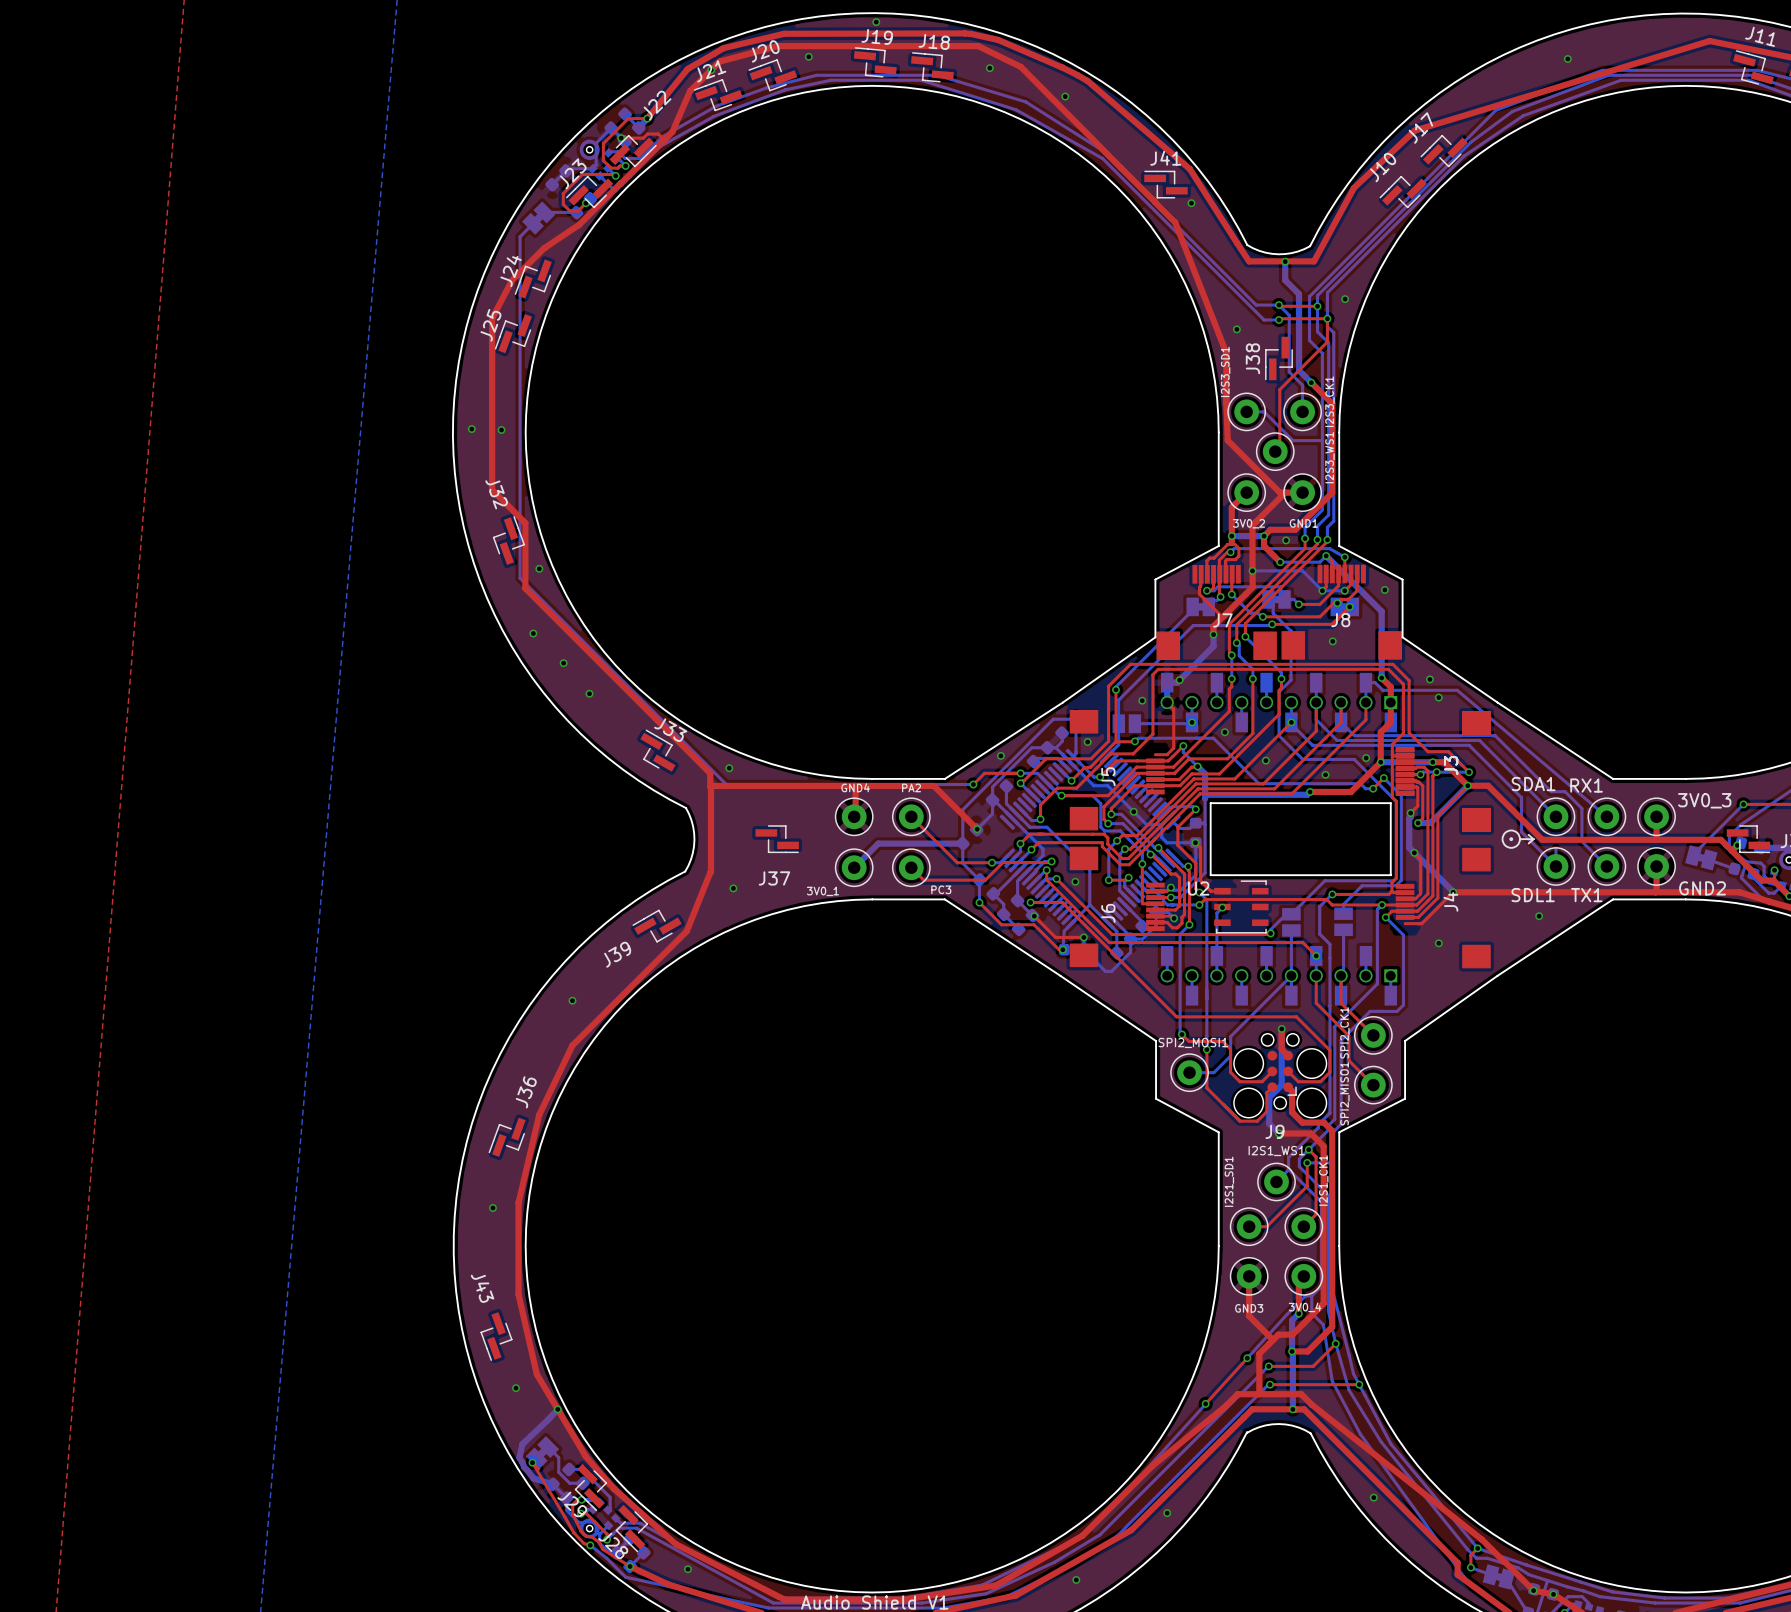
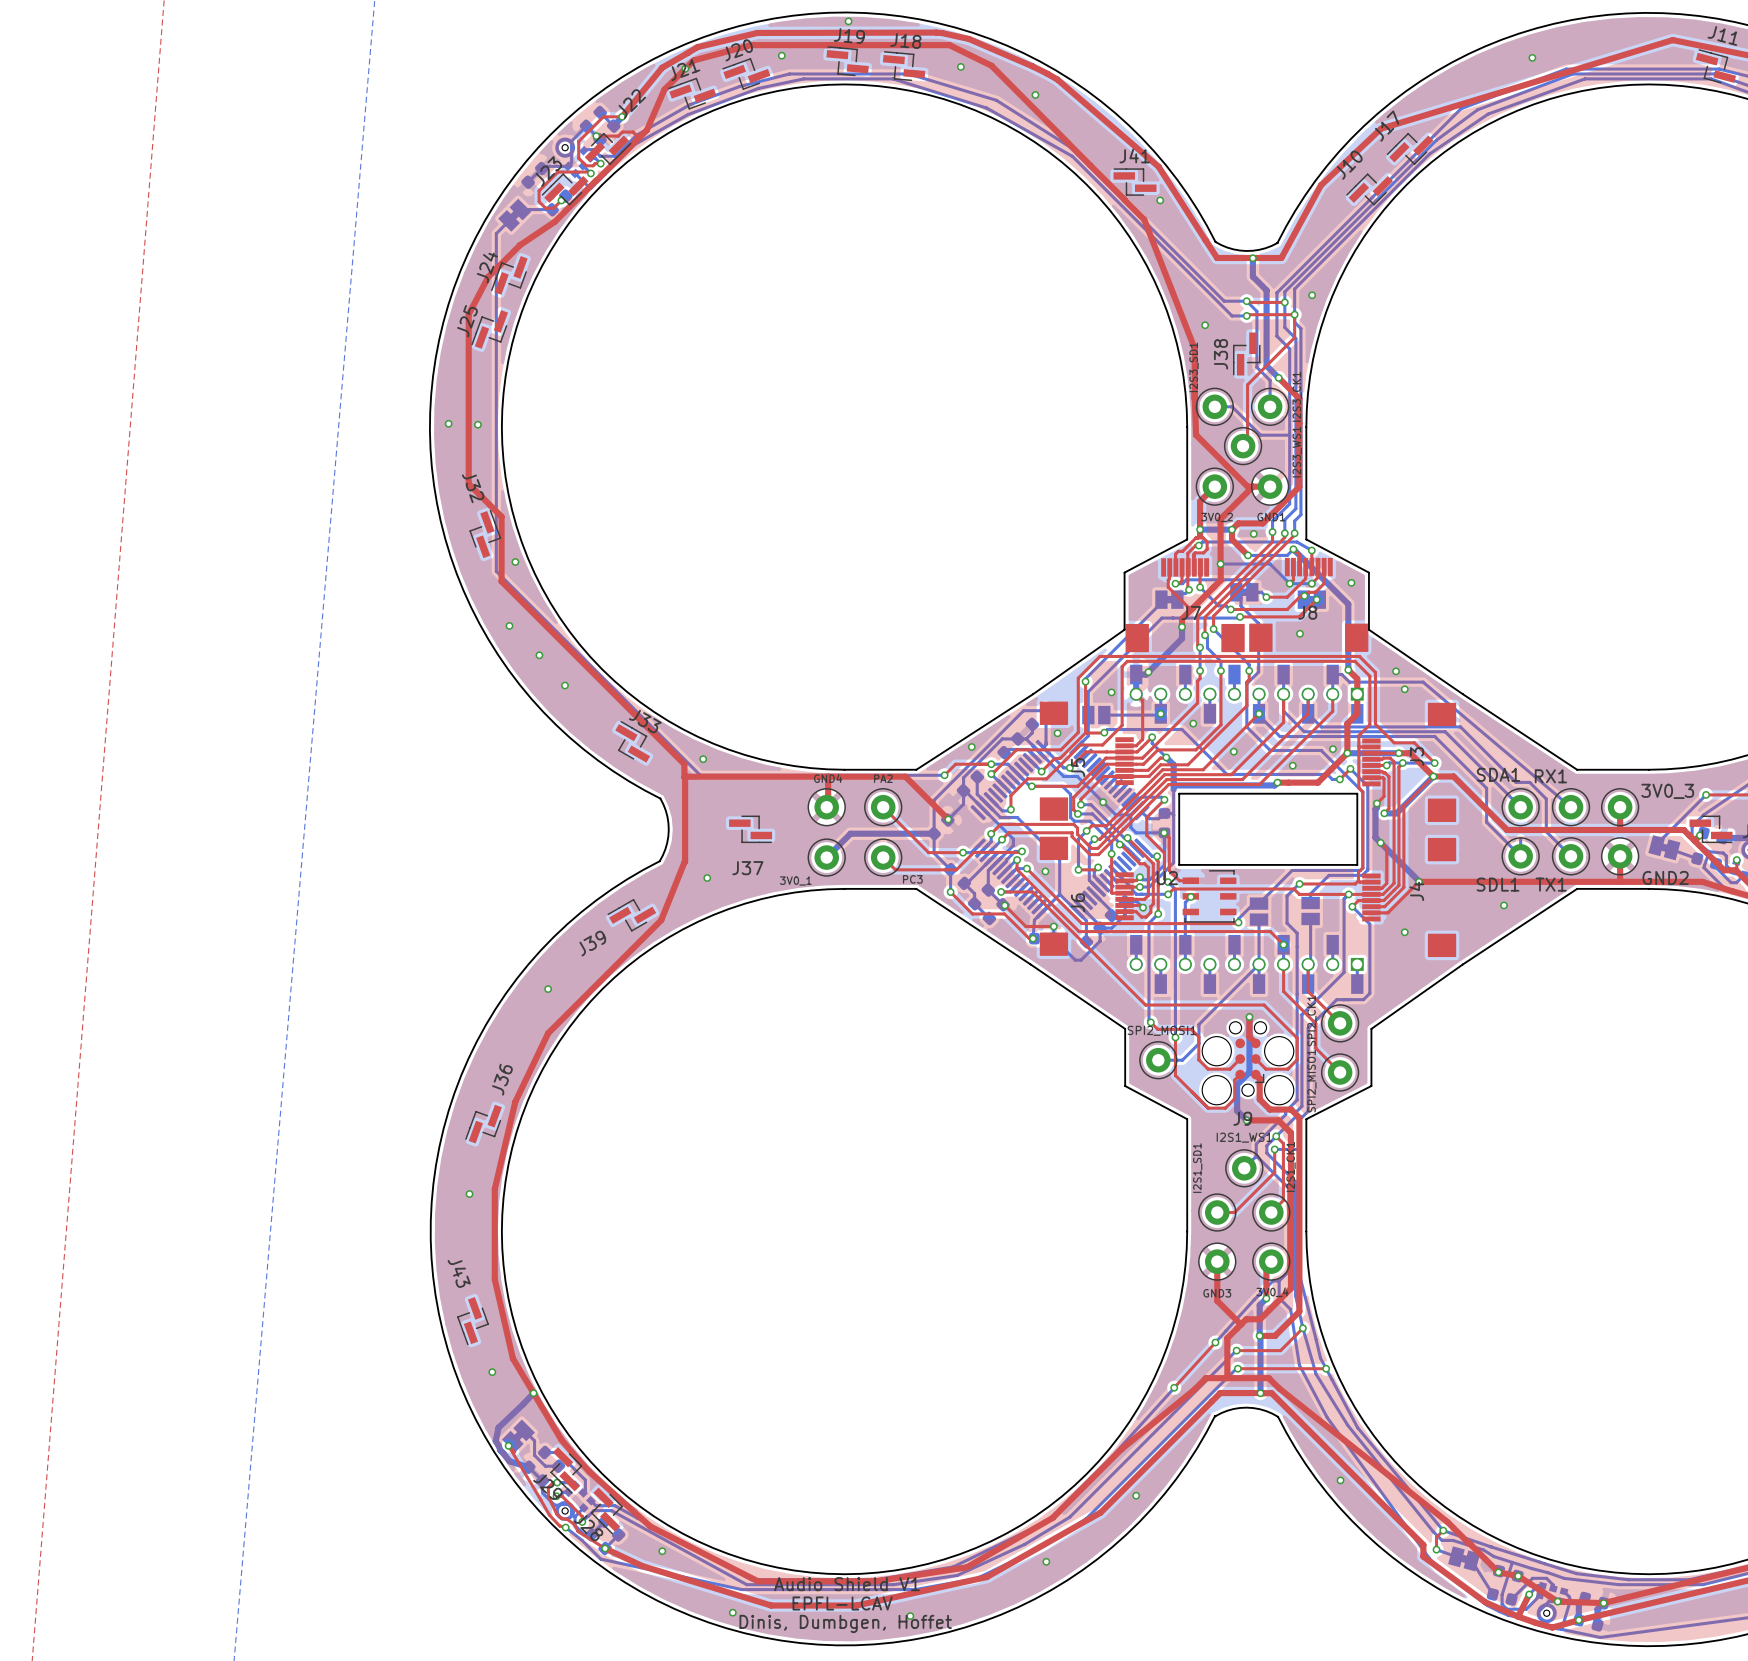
J5 footprint: [1069, 710, 1165, 831] -> [1039, 701, 1134, 821]
J3: (1443, 771) -> none
drawing: [1501, 829, 1535, 849] -> none
J4 footprint: [1395, 847, 1491, 969] -> [1362, 837, 1457, 958]

